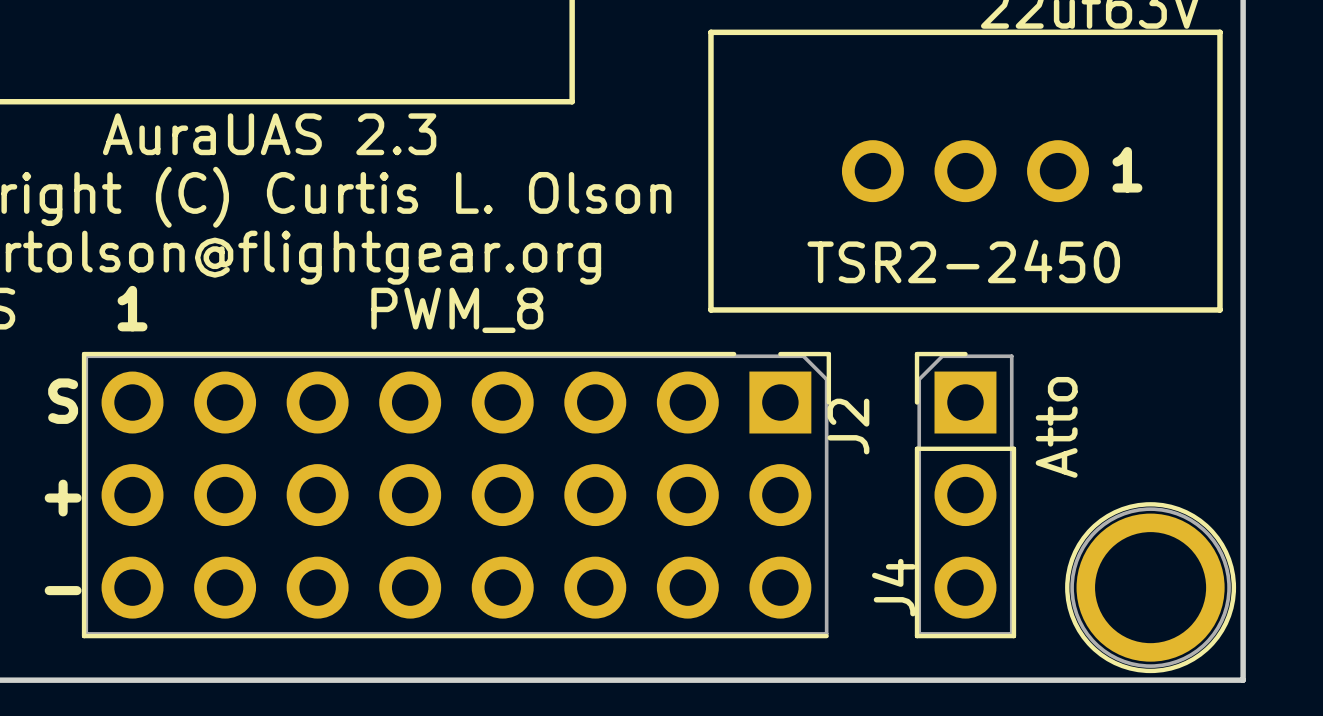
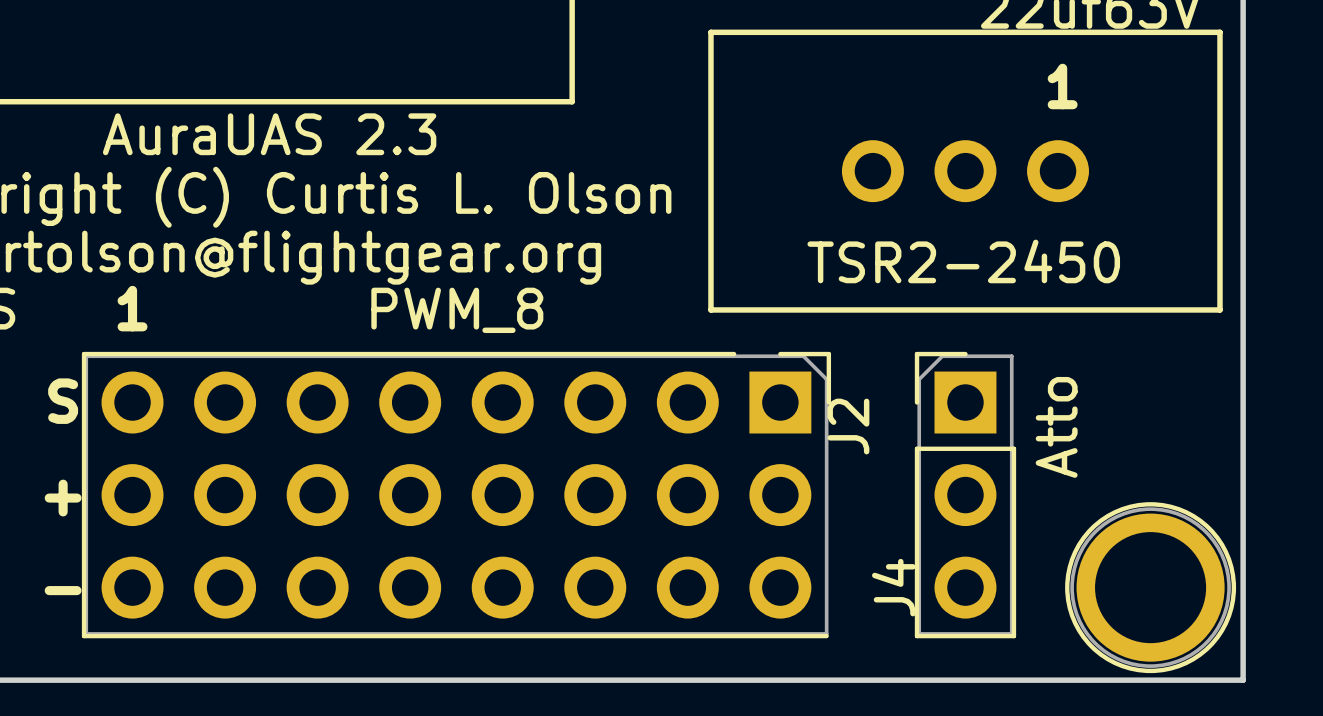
text position: 1 (1127, 169) -> 1 (1062, 86)

